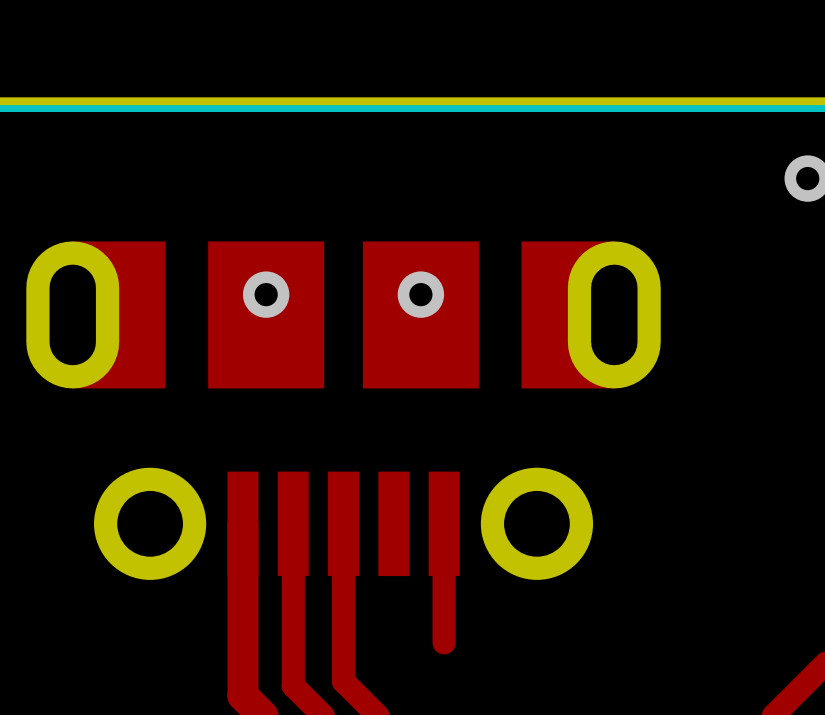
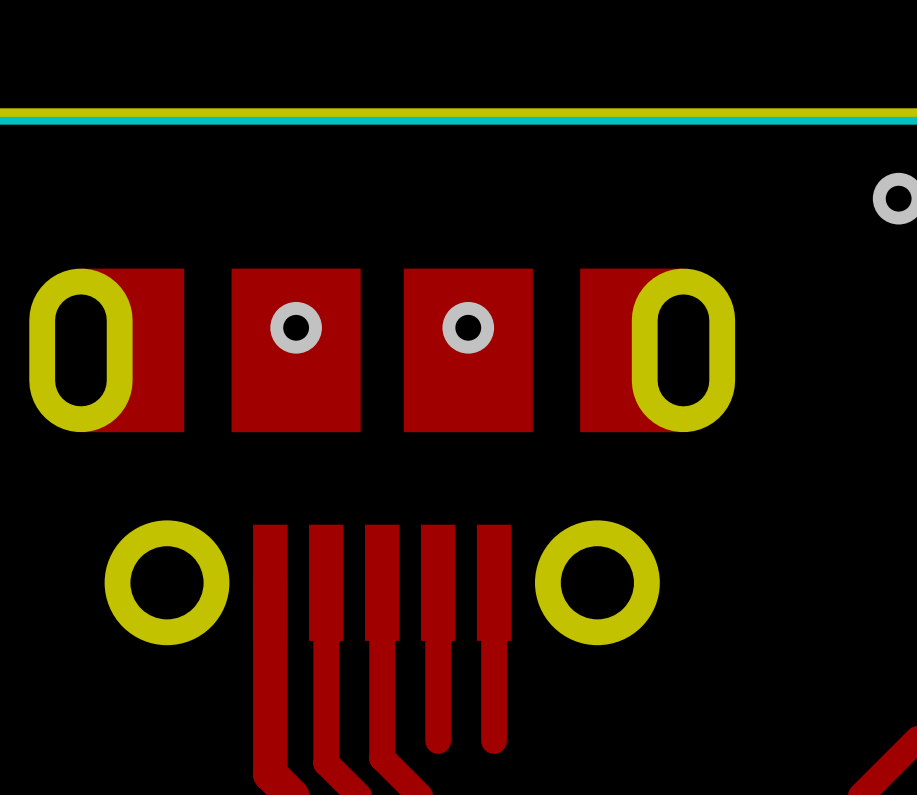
top track: none -> (438, 582) (438, 740)
top track: none -> (494, 715) (494, 740)

